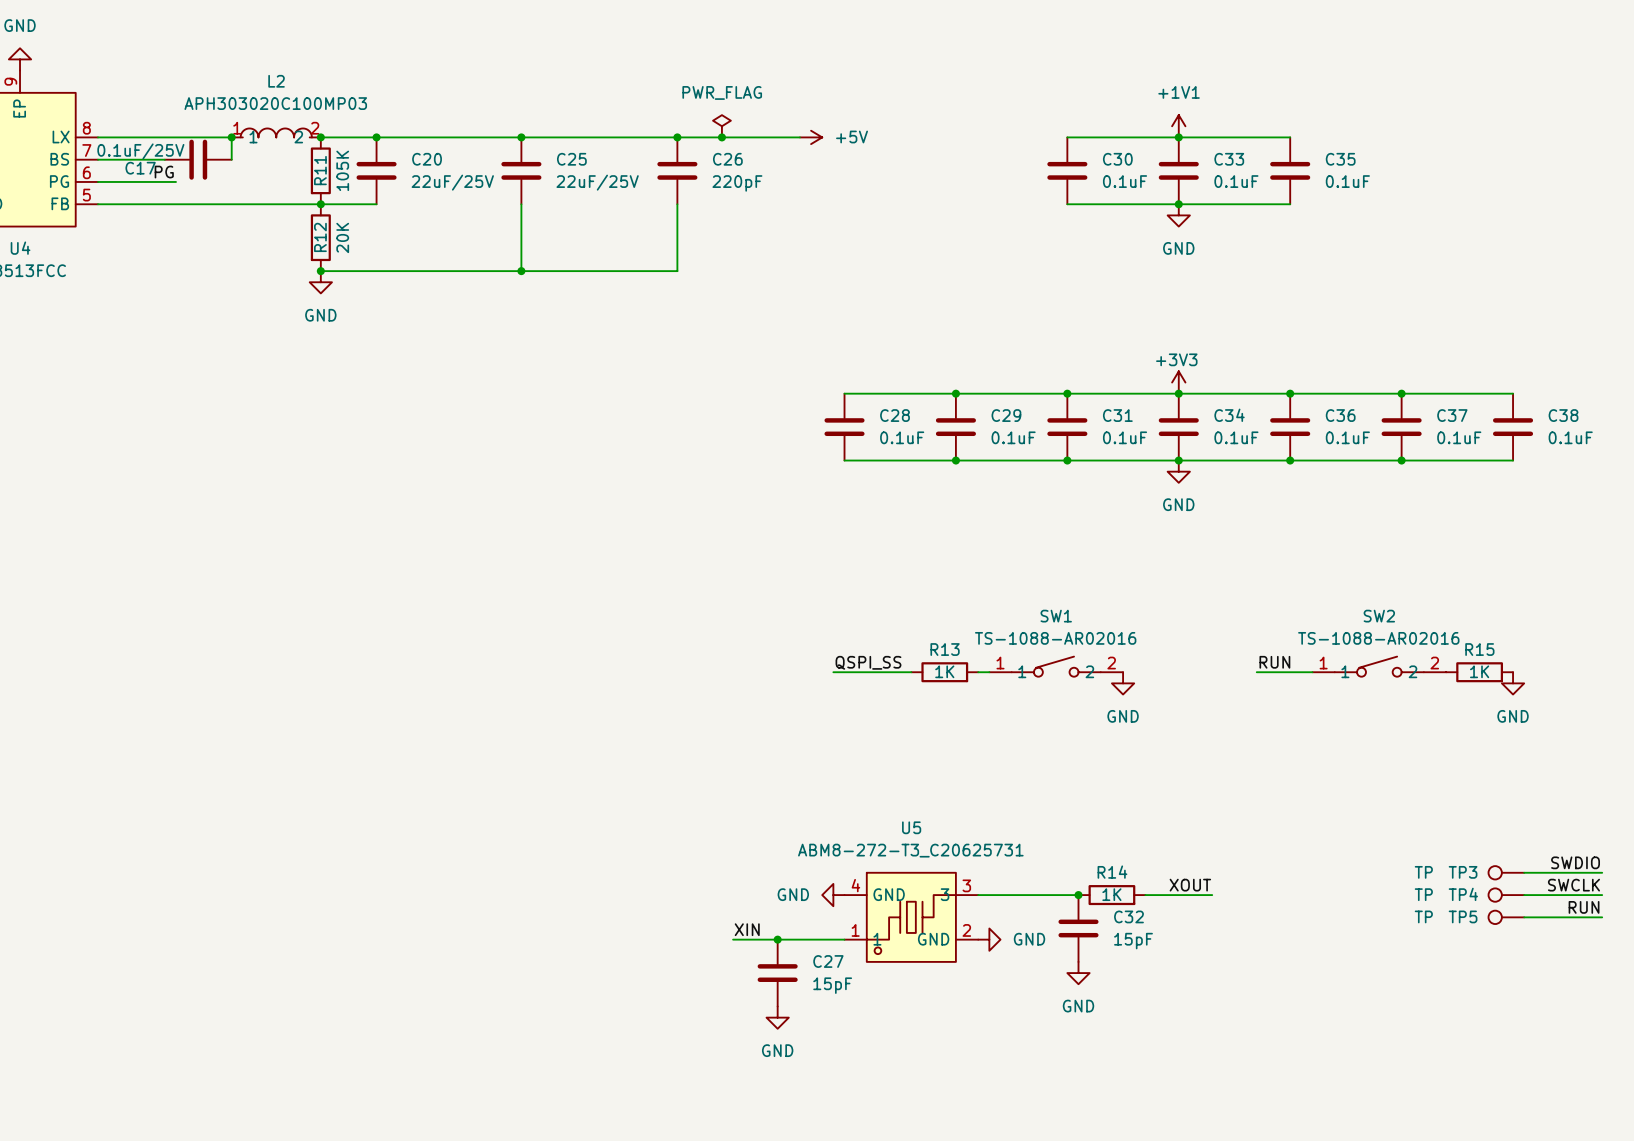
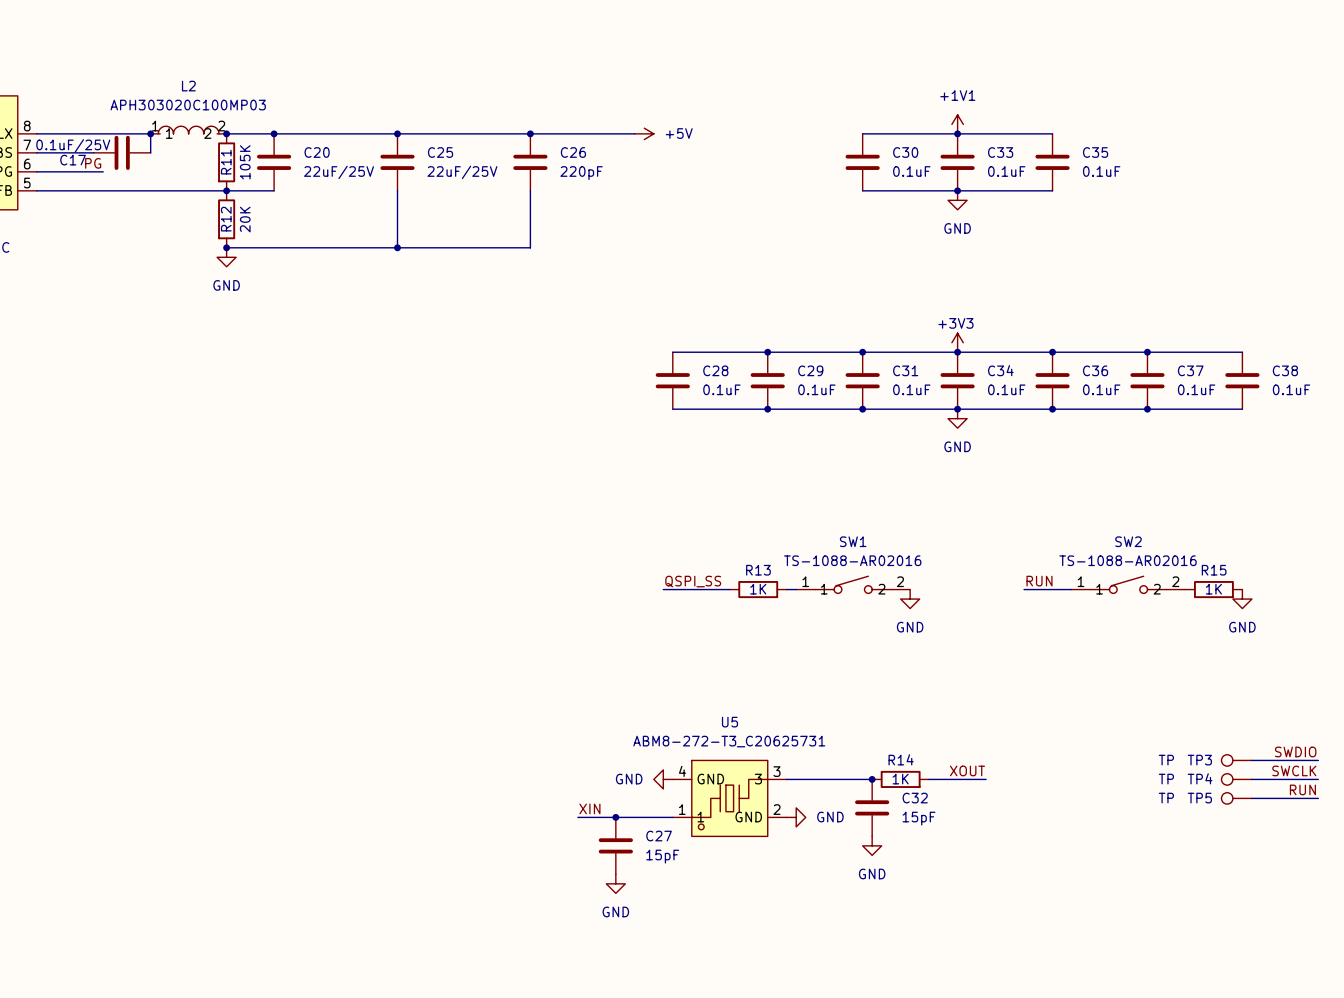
power symbol: PWR_FLAG (721, 126) -> none
junction: (721, 137) -> none

